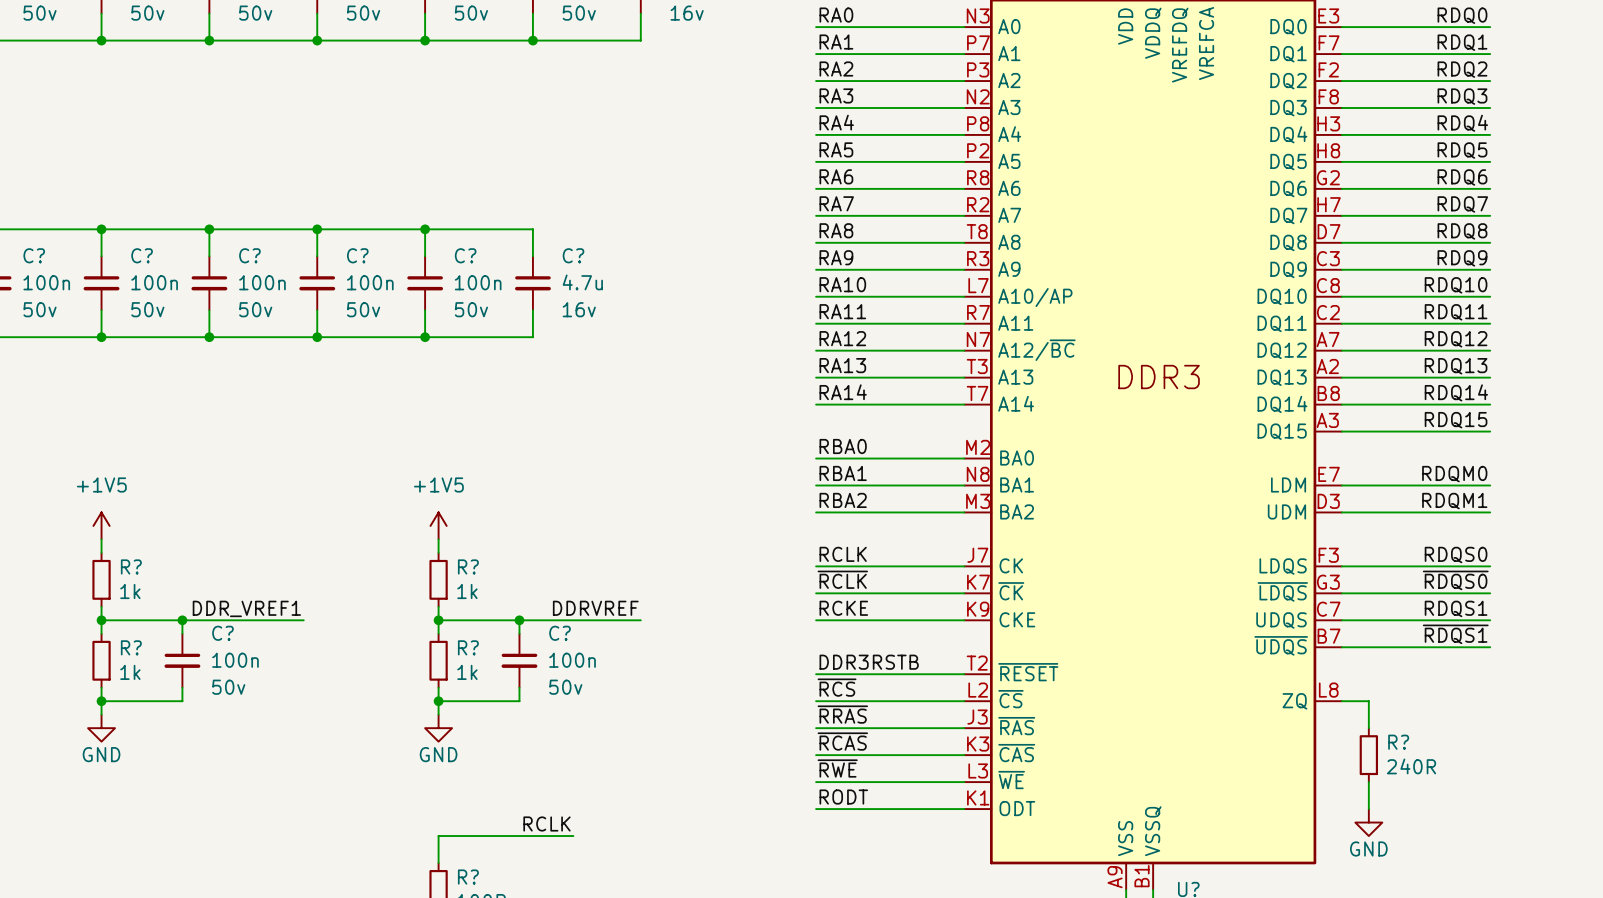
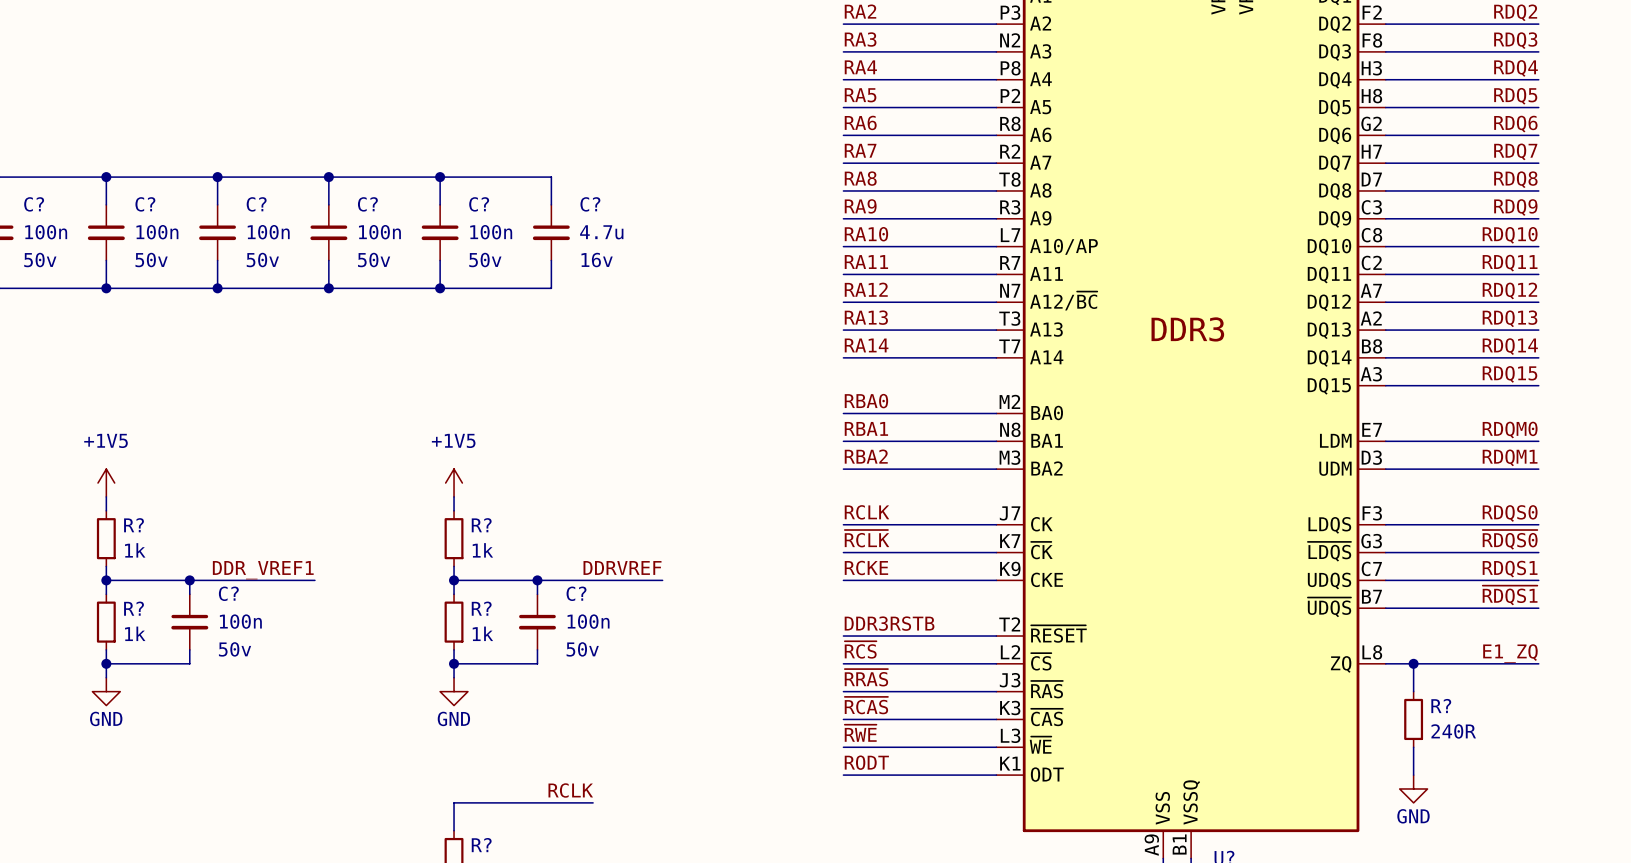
label: none -> E1_ZQ (1510, 653)
wire: none -> (1413, 663) (1538, 663)
junction: none -> (1413, 663)

